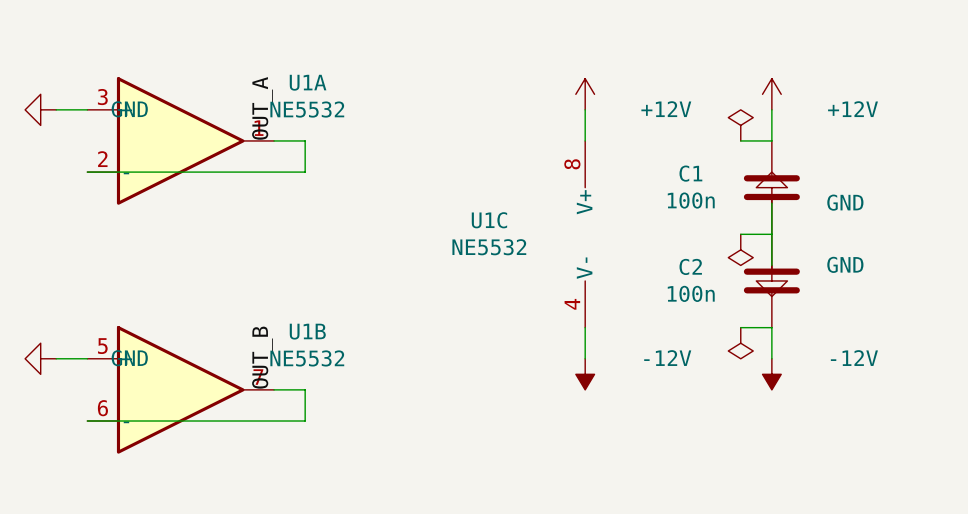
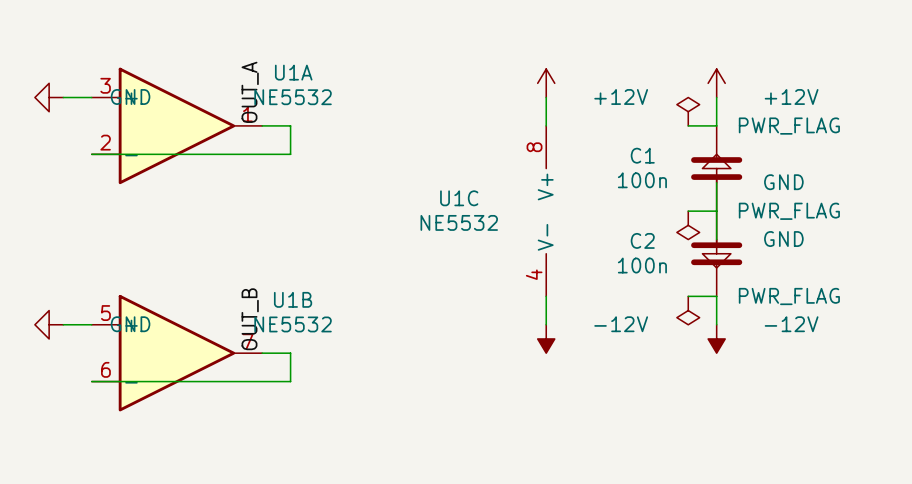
power symbol text: none -> PWR_FLAG (789, 126)
power symbol text: none -> PWR_FLAG (789, 211)
power symbol text: none -> PWR_FLAG (789, 296)

